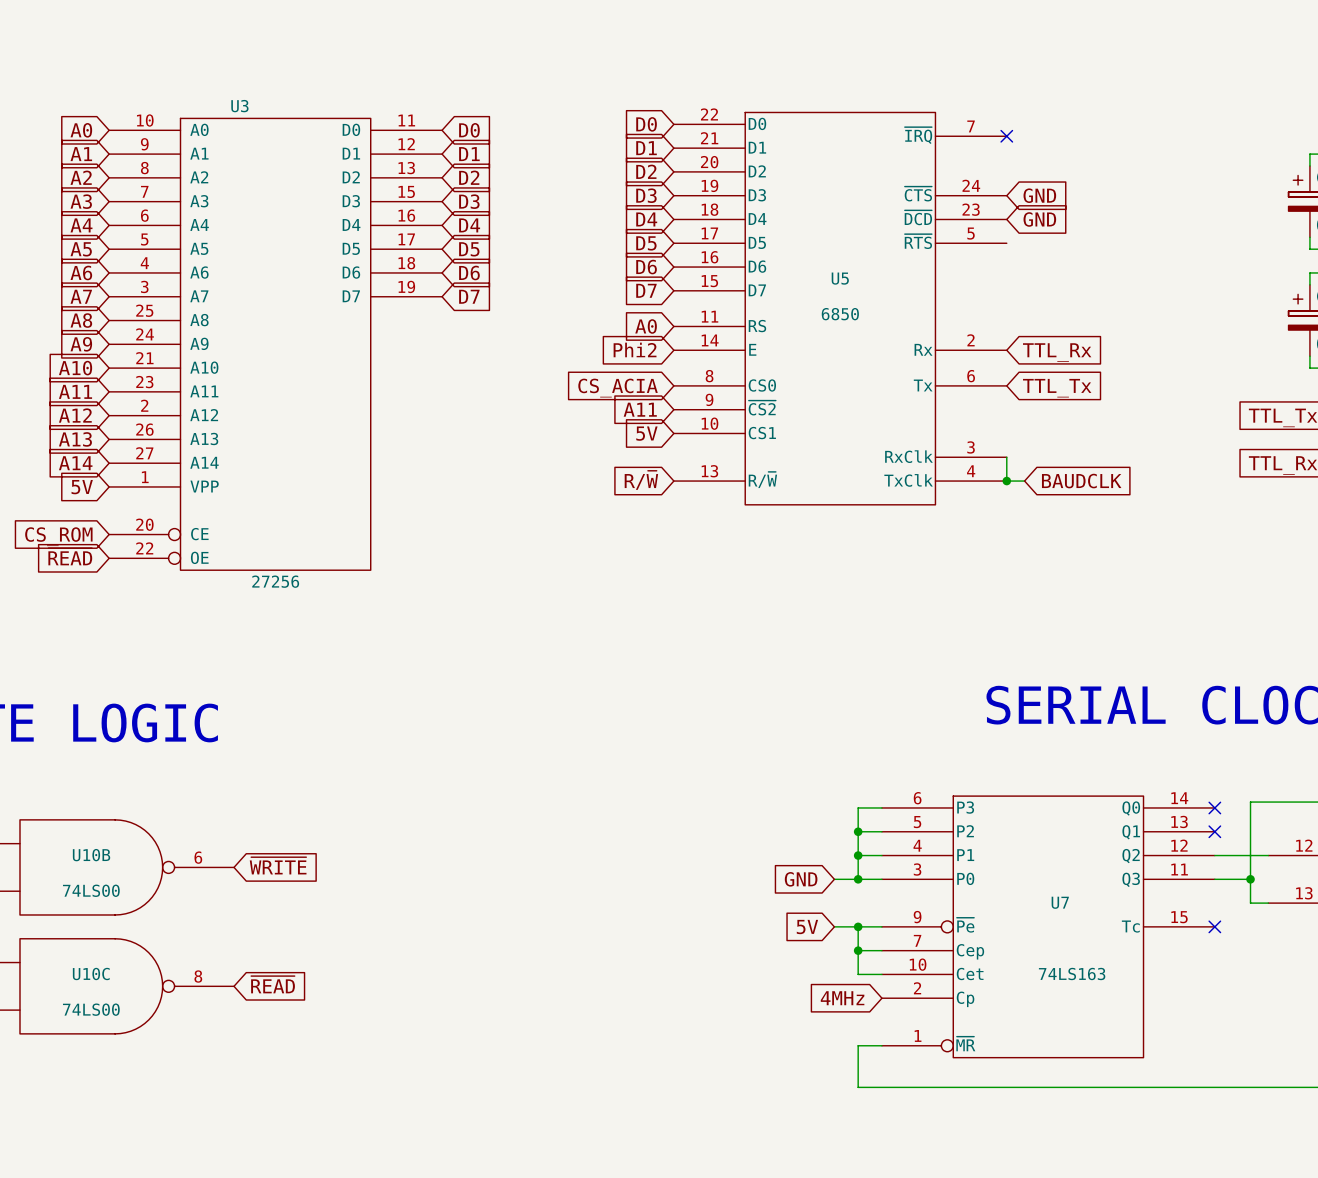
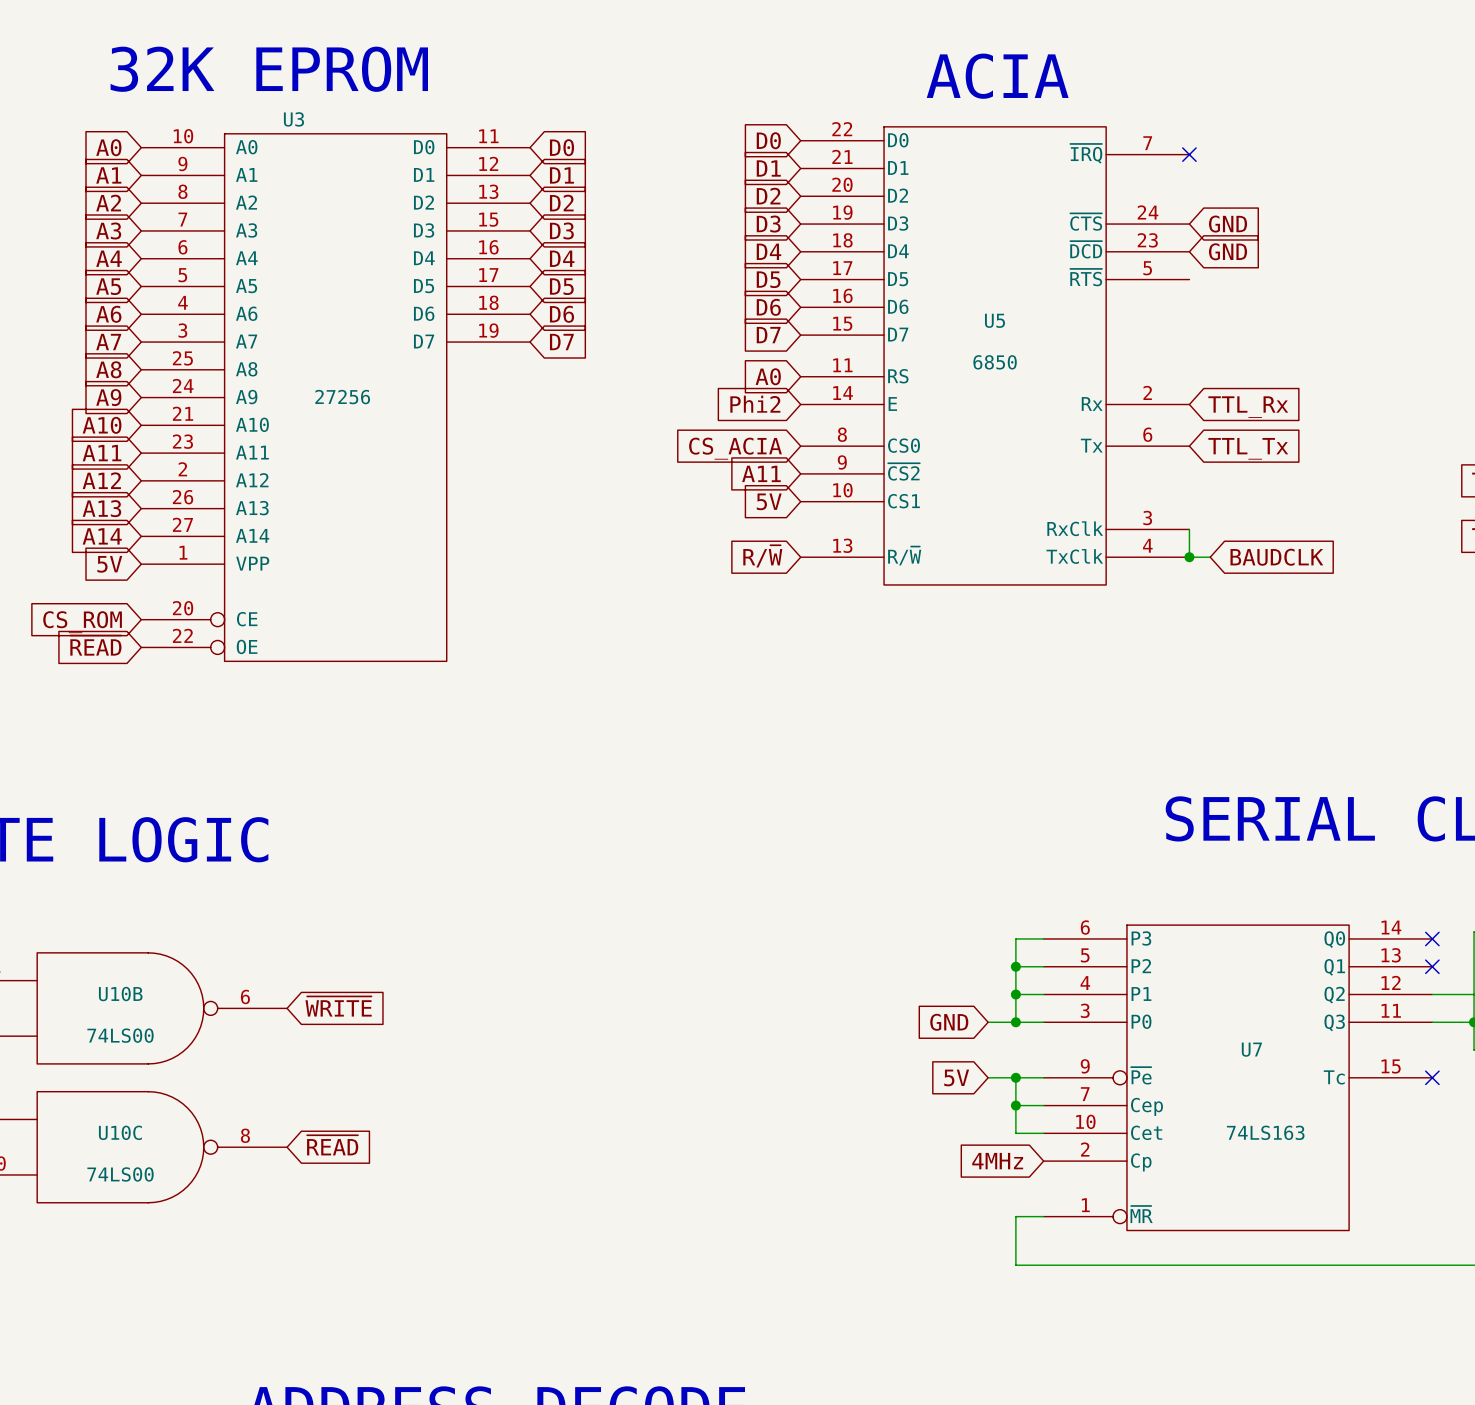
text: none -> 32K EPROM (269, 69)
text: none -> ACIA (997, 76)
U3 value position: 27256 (275, 581) -> 27256 (342, 397)

